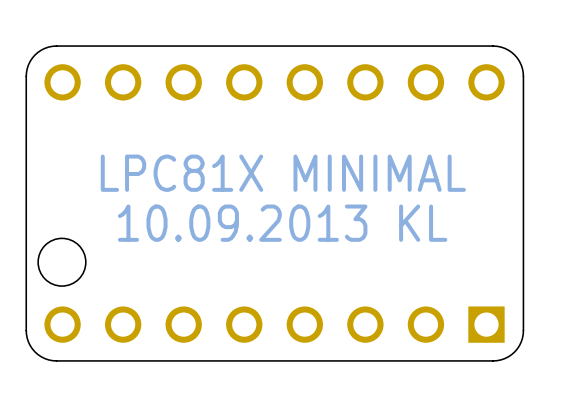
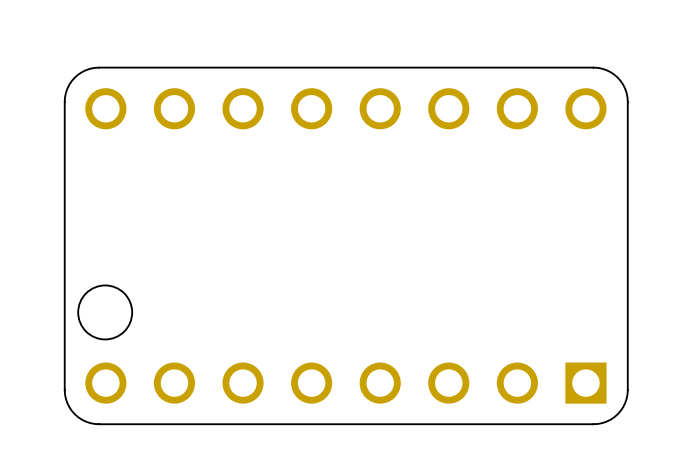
text: LPC81X MINIMAL (283, 173) -> none
text: 10.09.2013 KL (282, 223) -> none

